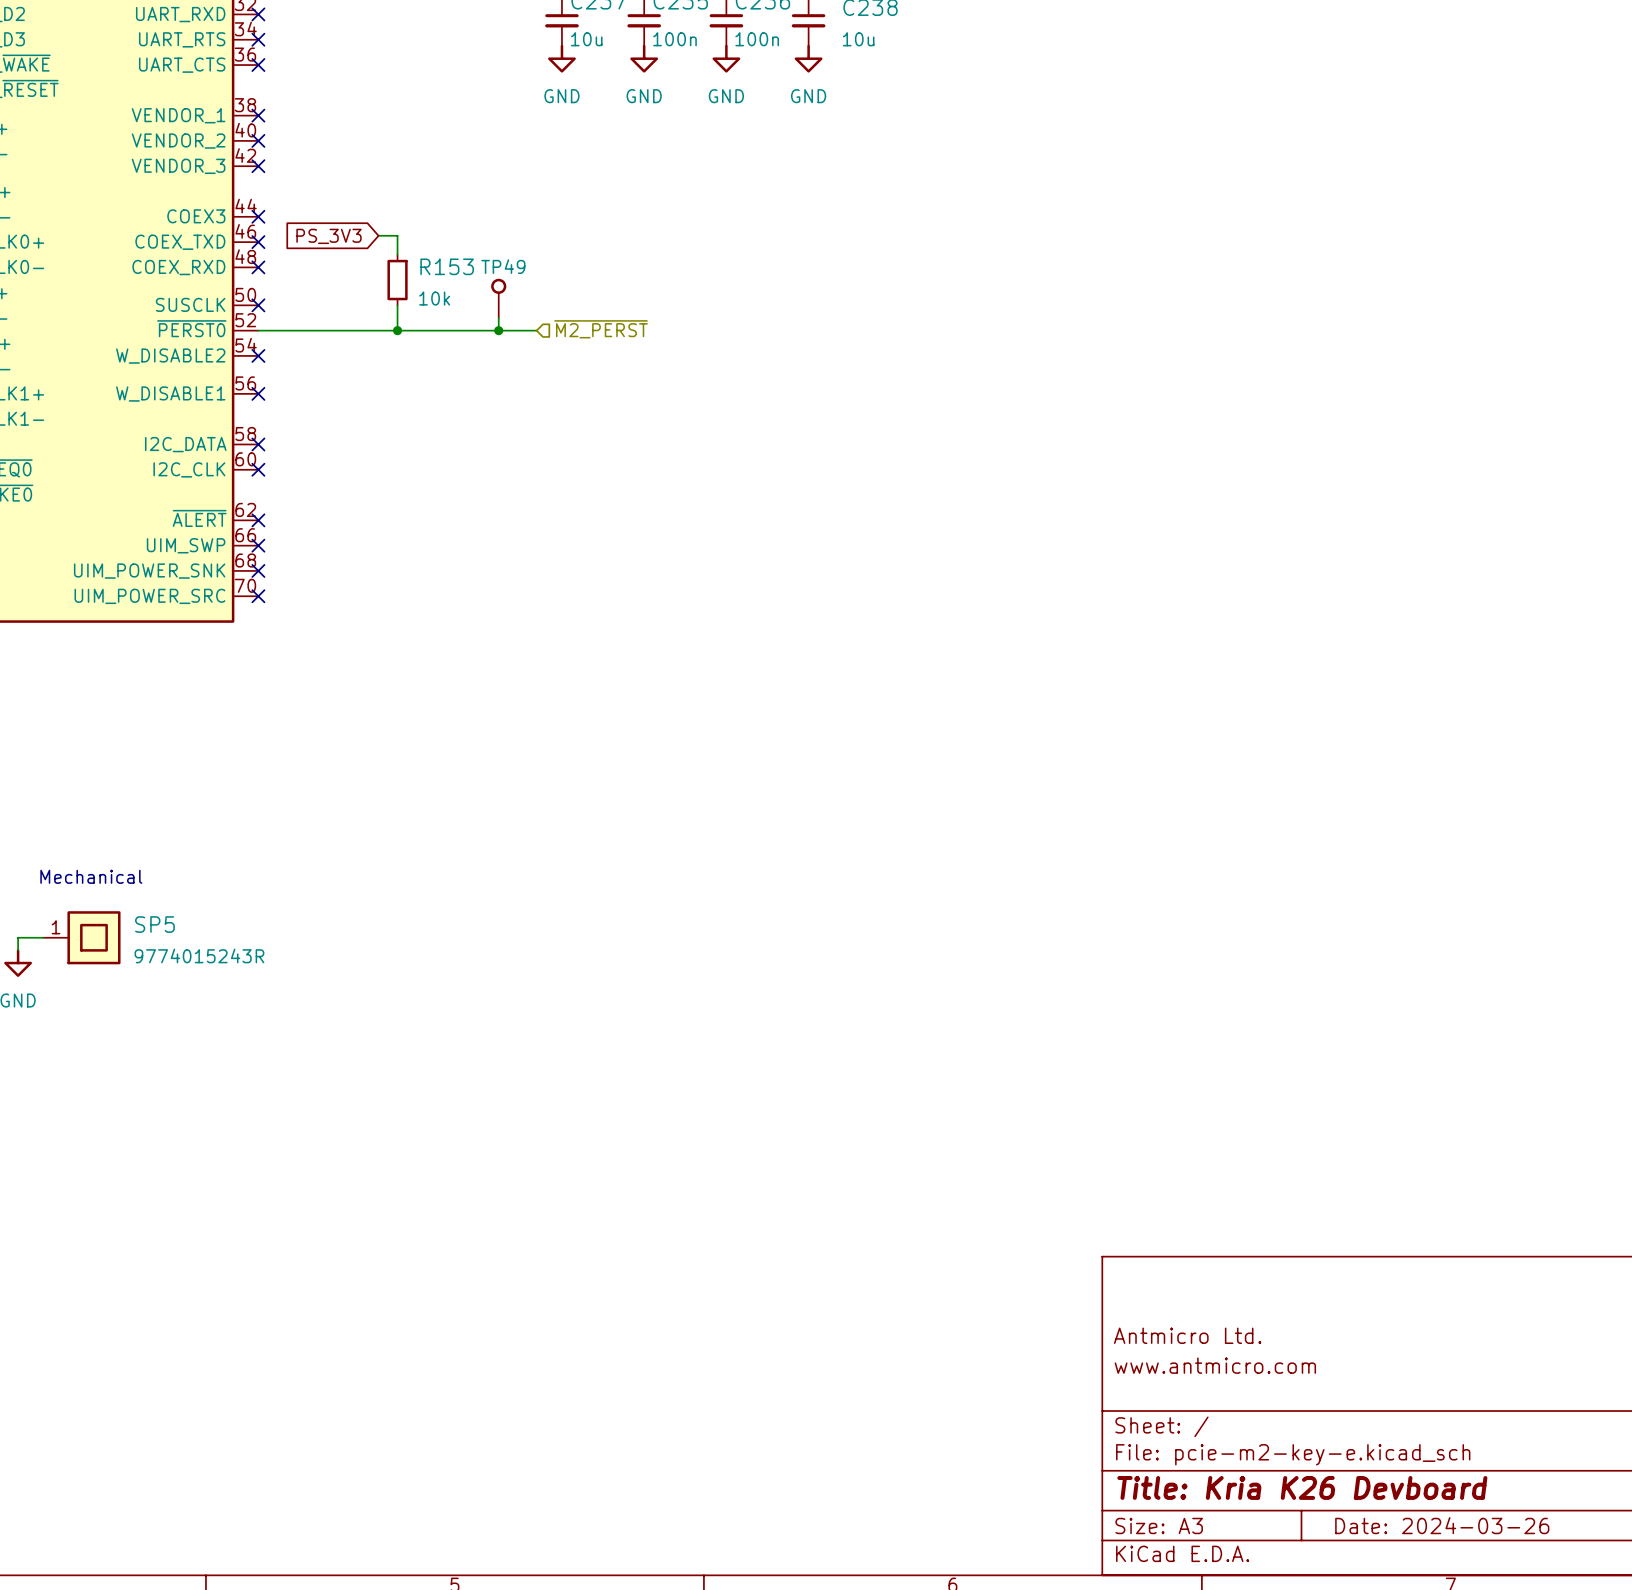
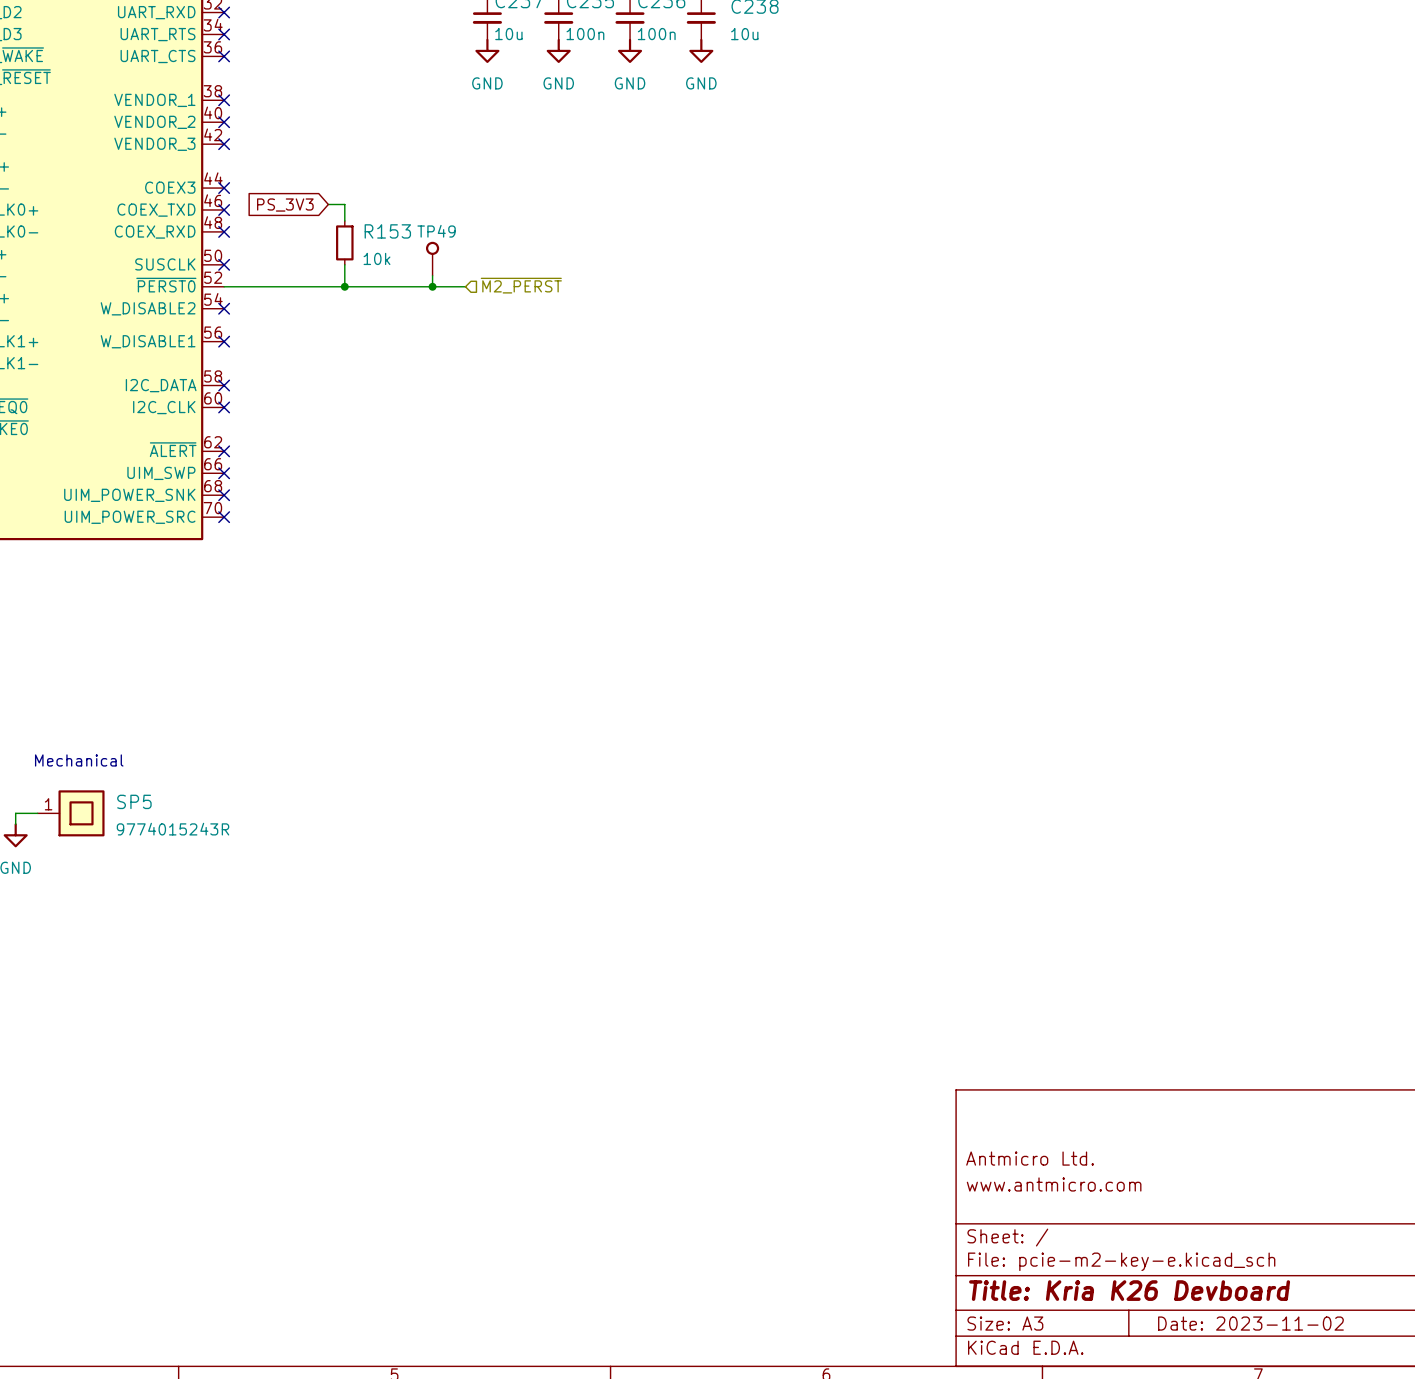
title block: Date: 2024-03-26 (1442, 1525) -> Date: 2023-11-02 (1250, 1323)

